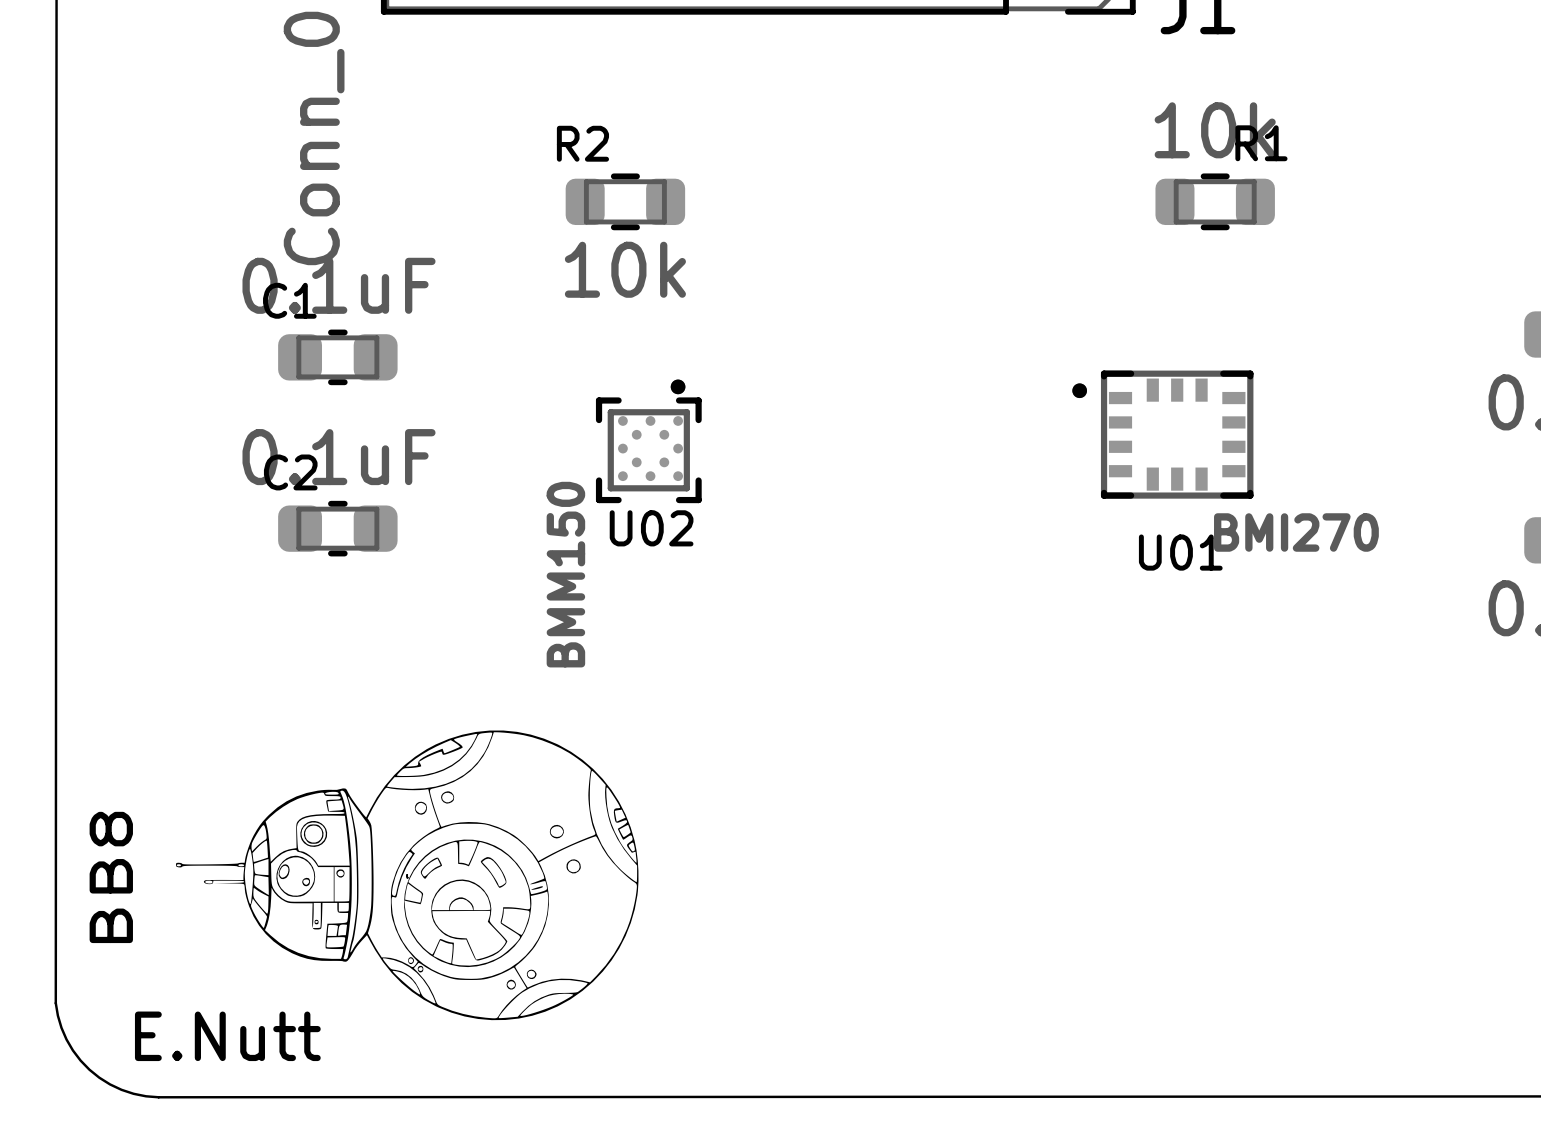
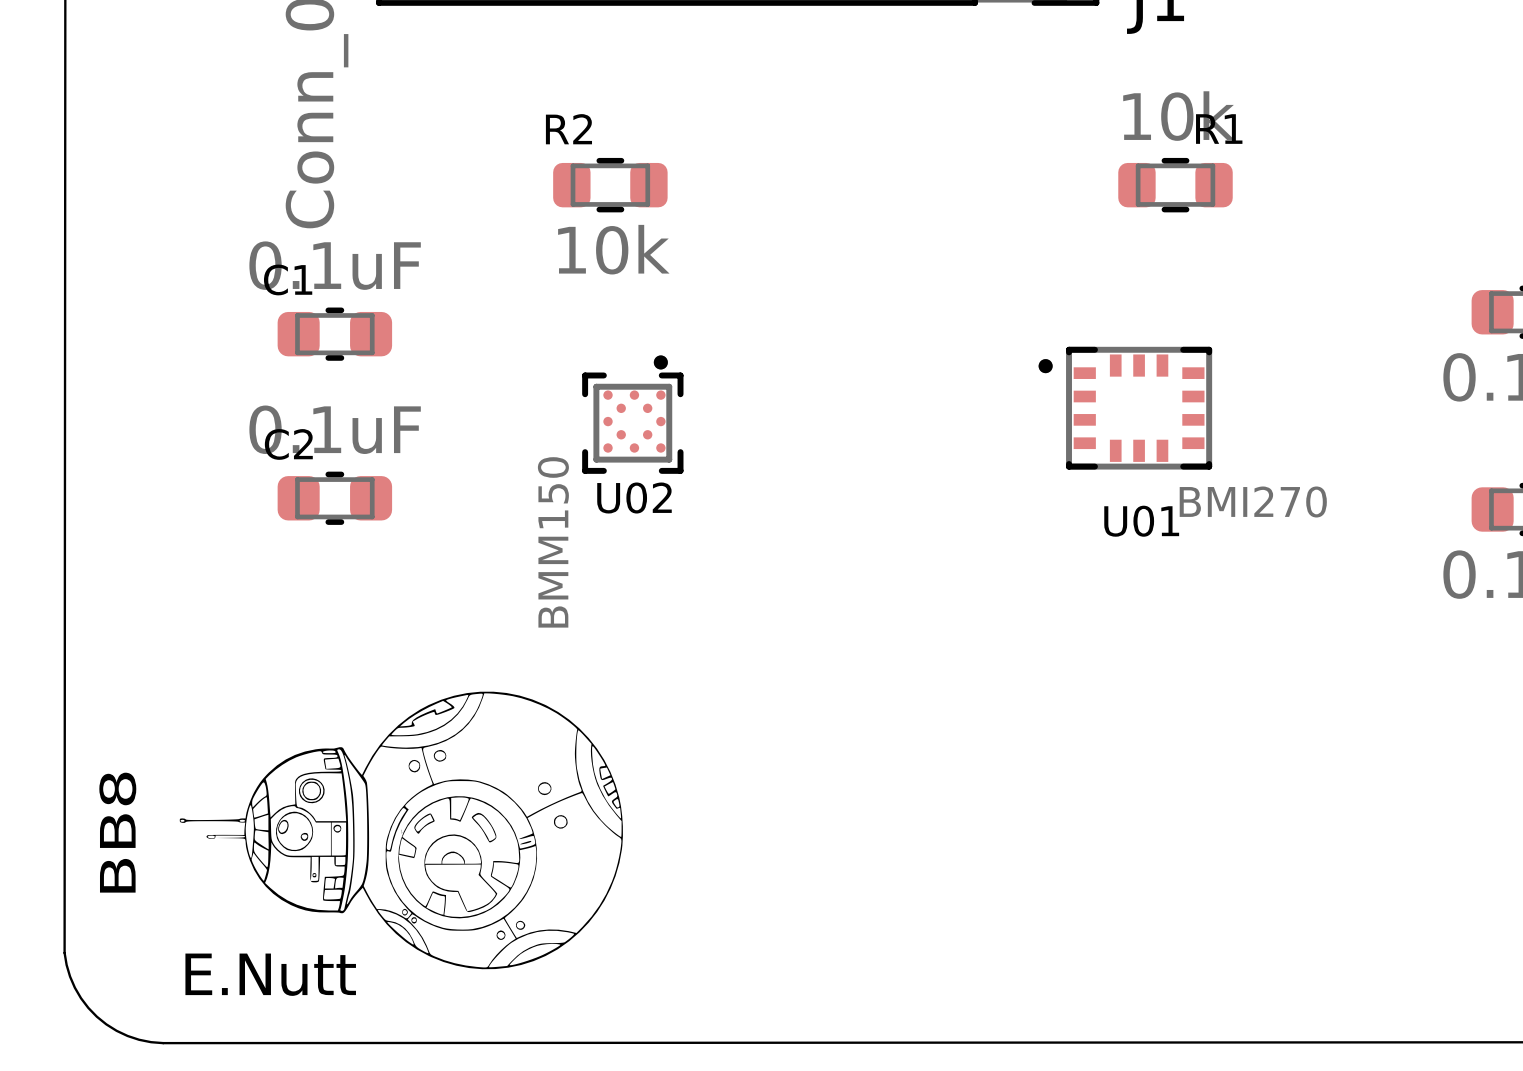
text position: E.Nutt (227, 1036) -> E.Nutt (270, 974)

